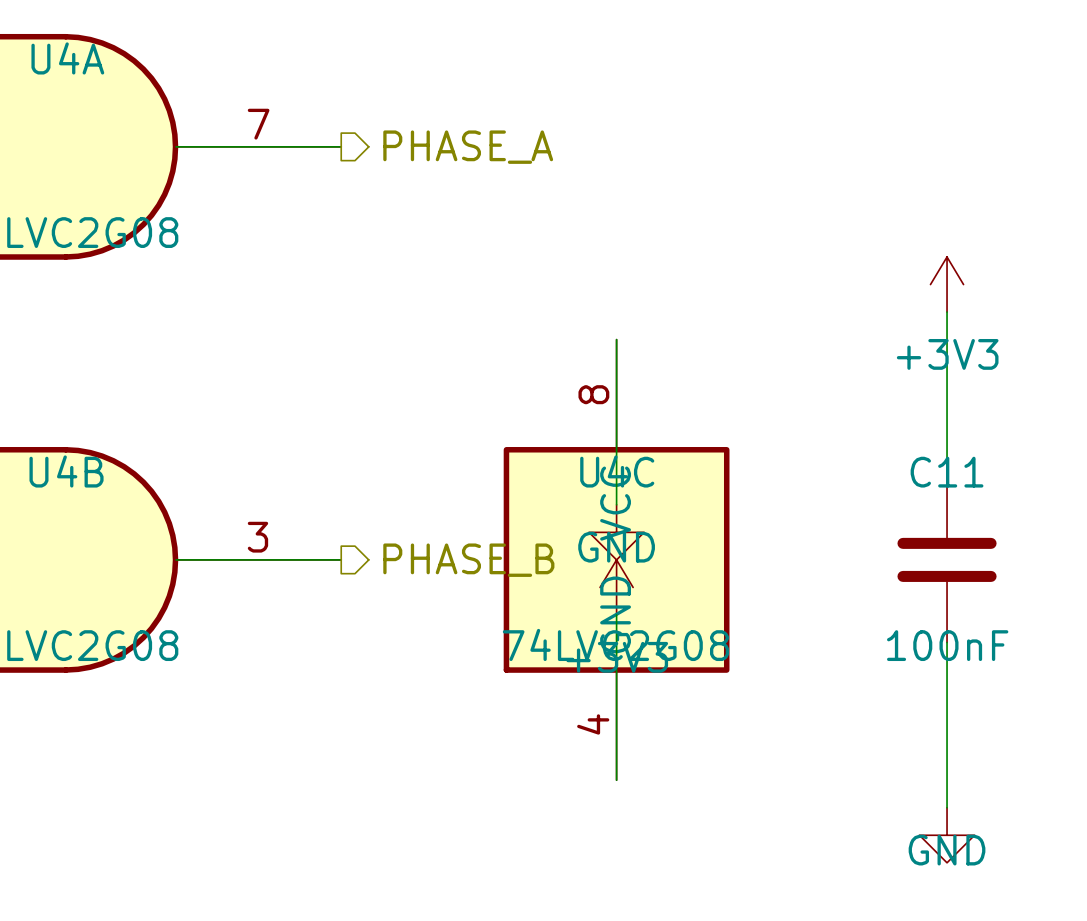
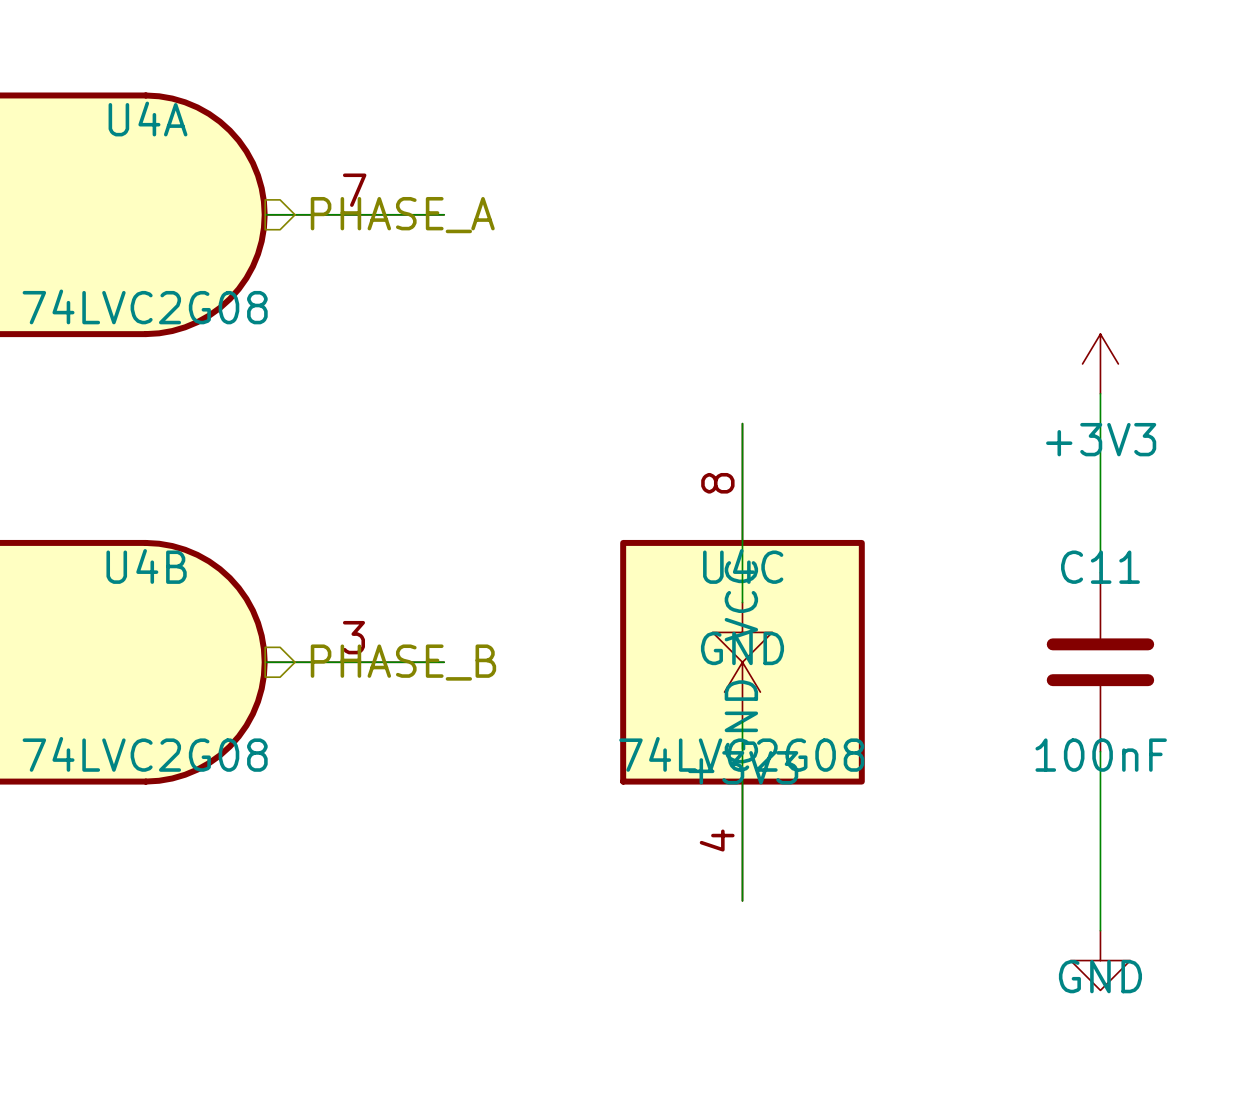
hierarchical label position: PHASE_A (468, 147) -> PHASE_A (402, 215)
hierarchical label position: PHASE_B (468, 560) -> PHASE_B (403, 662)

